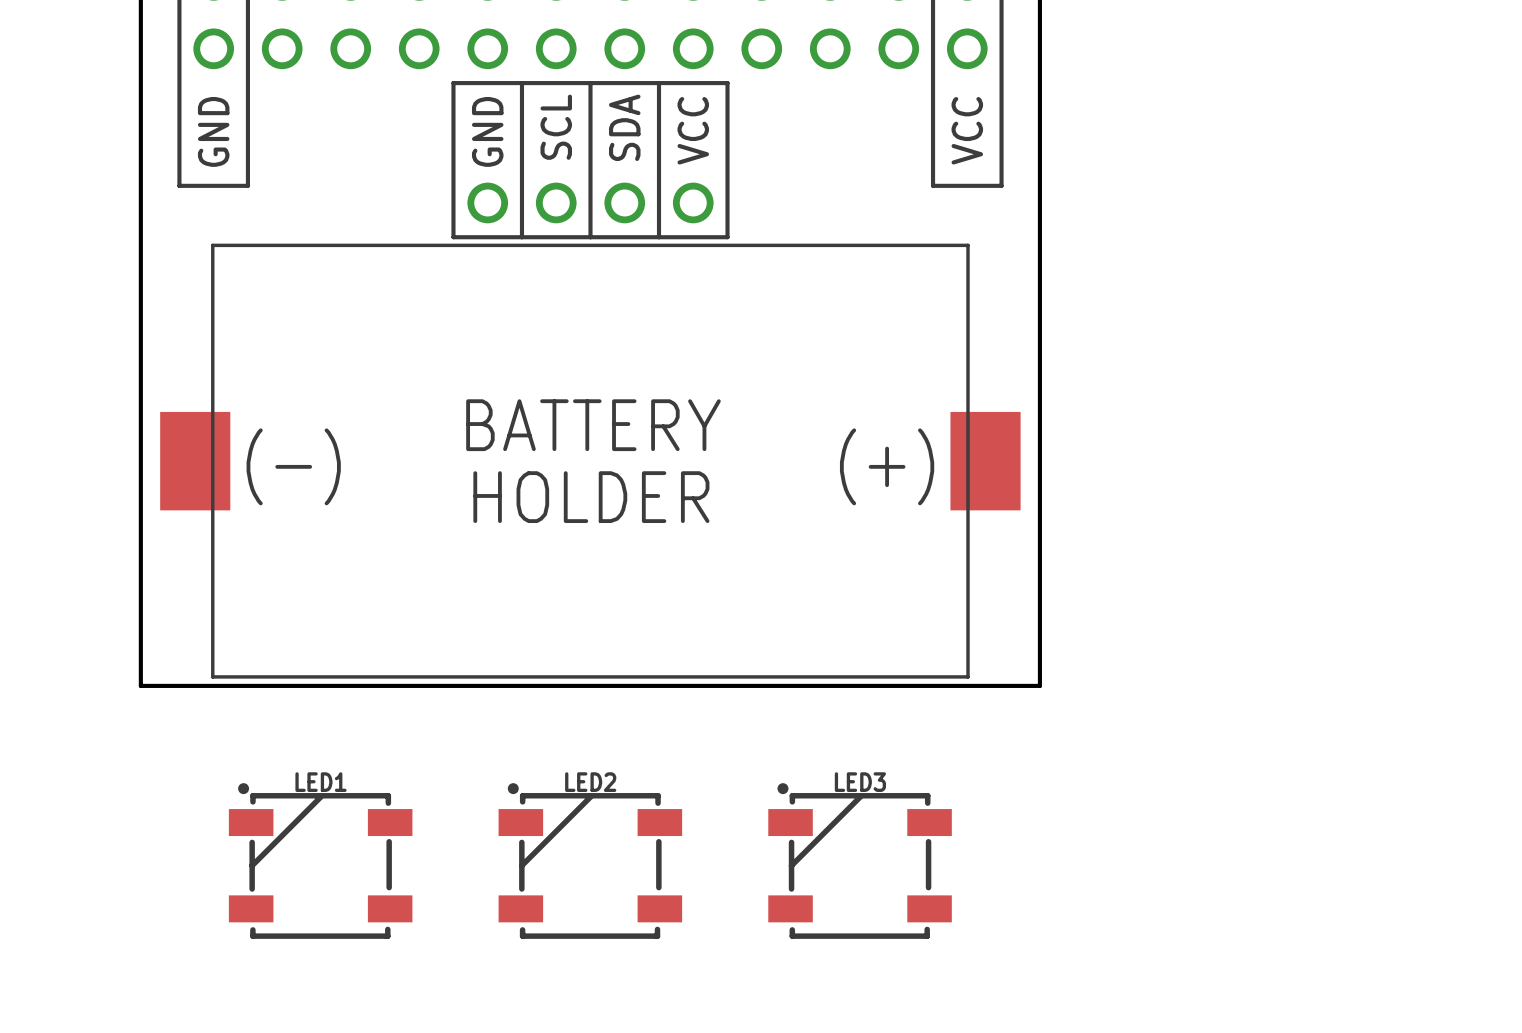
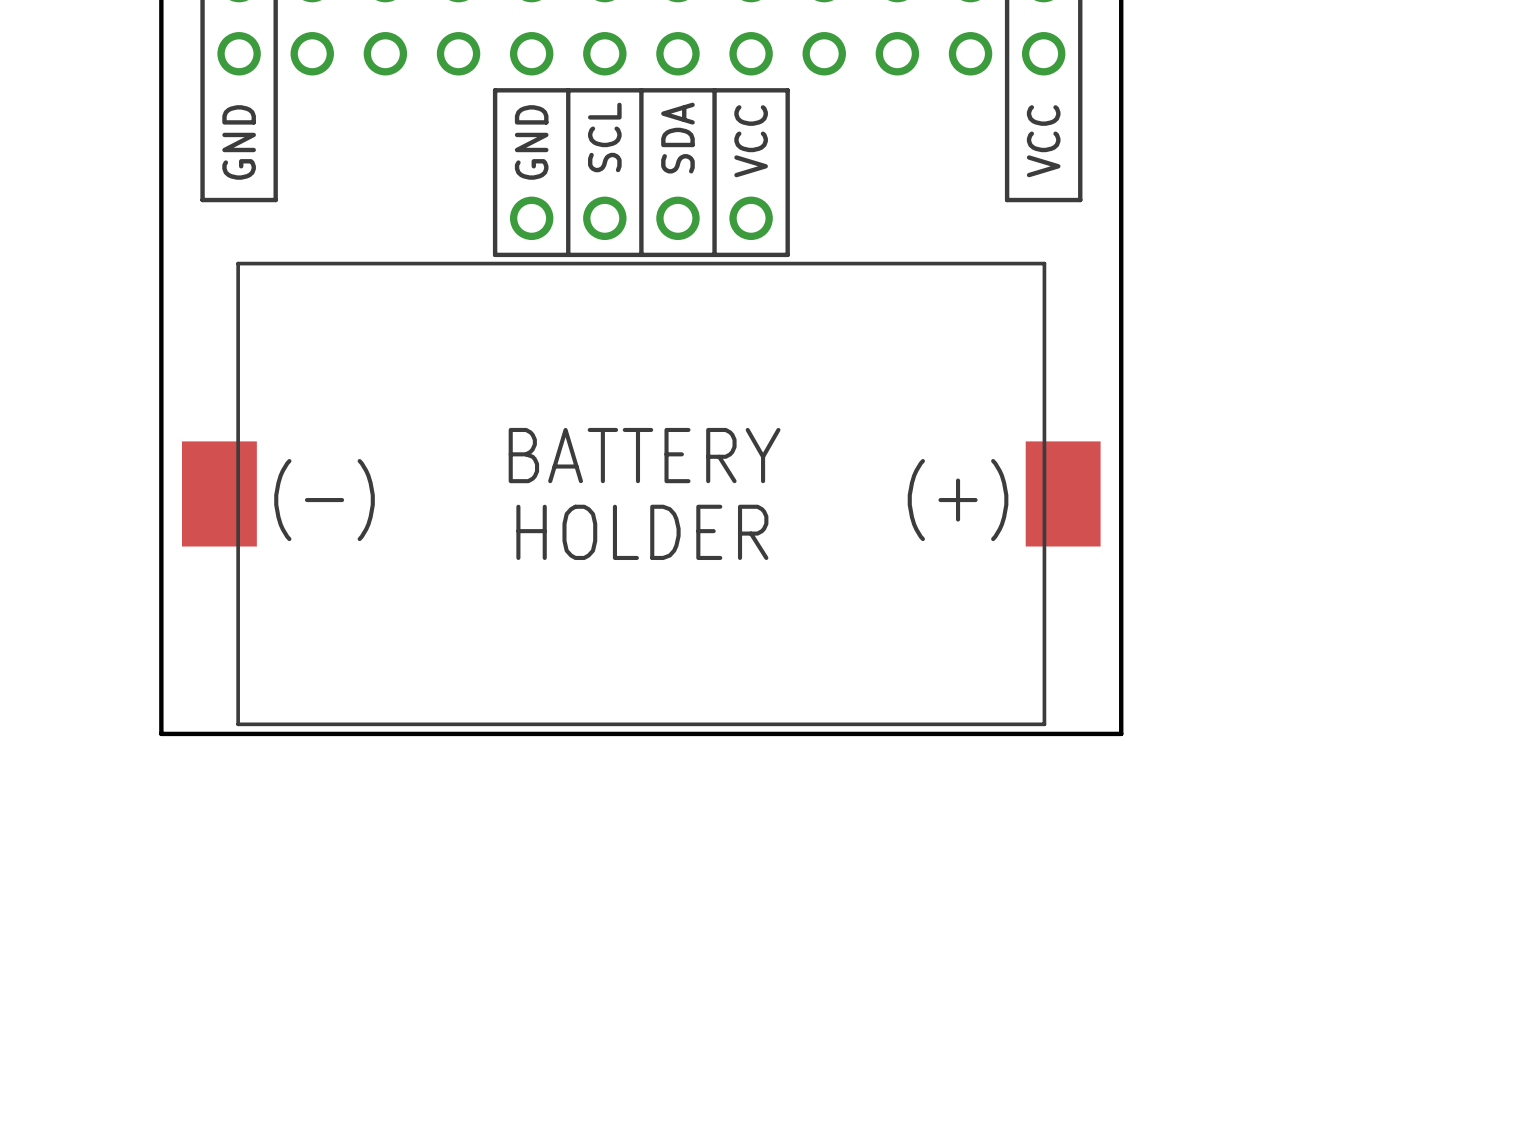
LED1: (320, 861) -> none
LED2: (590, 861) -> none
LED3: (860, 861) -> none

